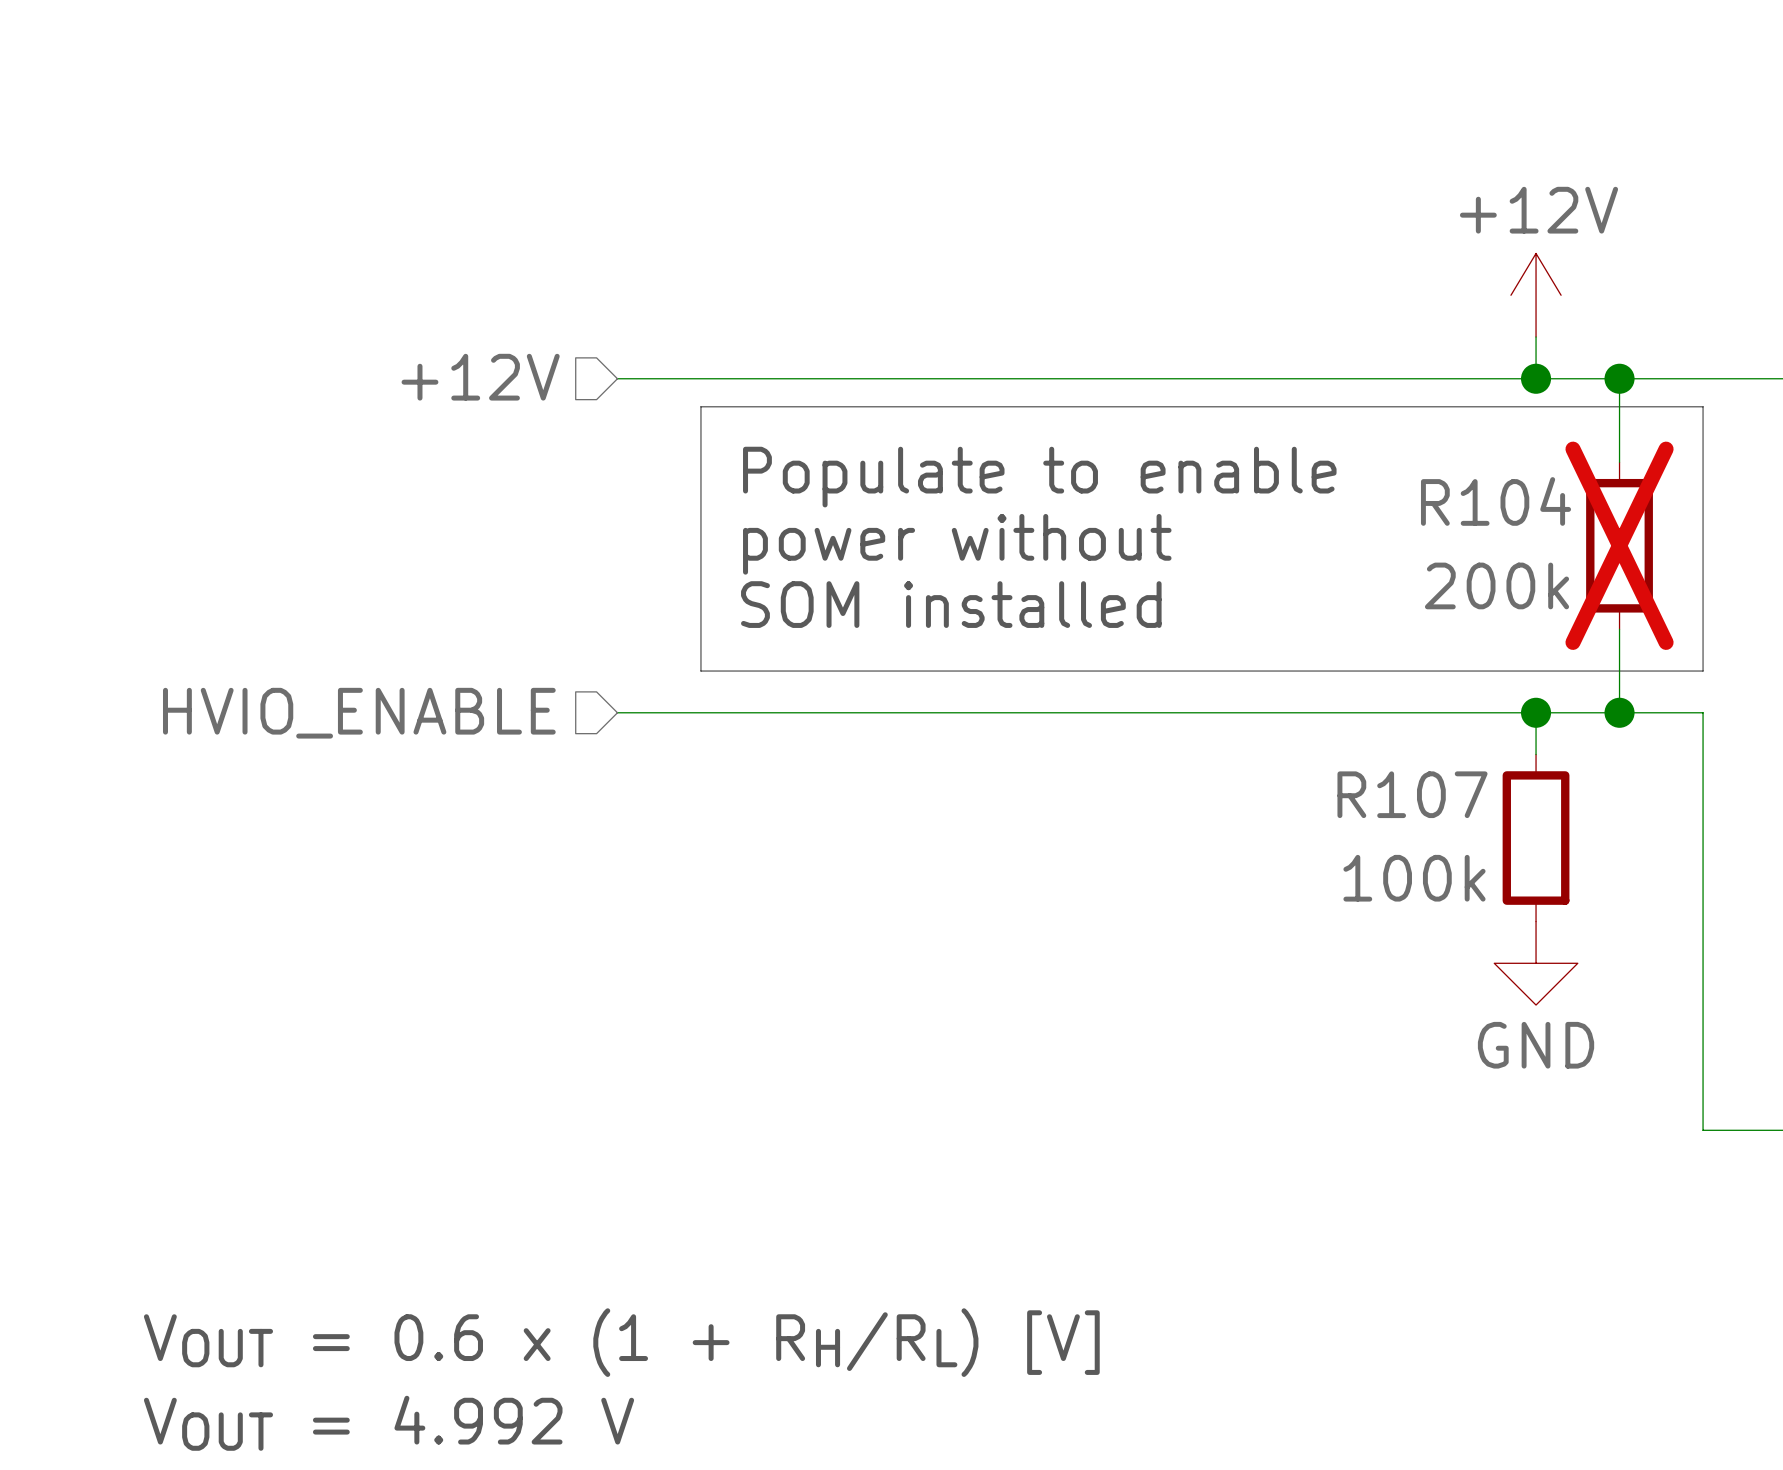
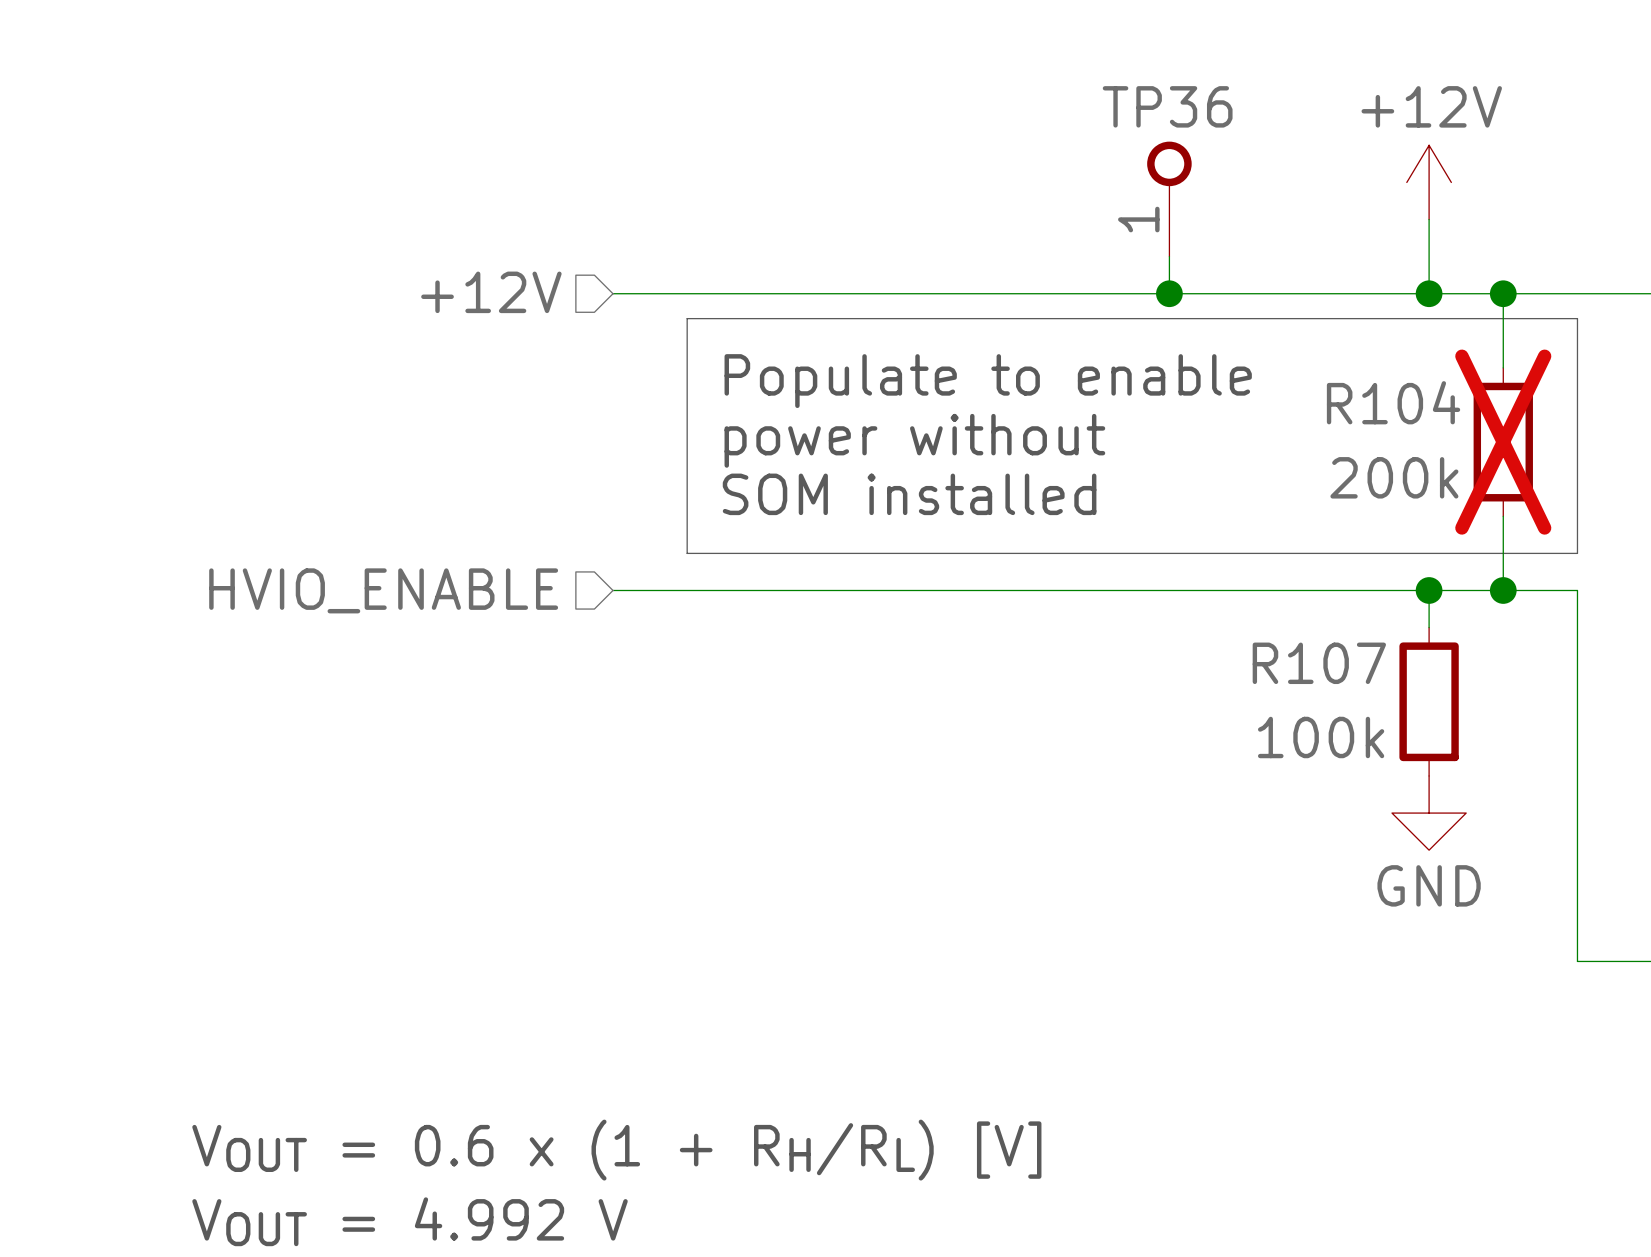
TP36: none -> (1169, 199)
power symbol position: +12V (1536, 295) -> +12V (1429, 182)
wire: none -> (1169, 256) (1169, 293)
junction: none -> (1169, 293)

